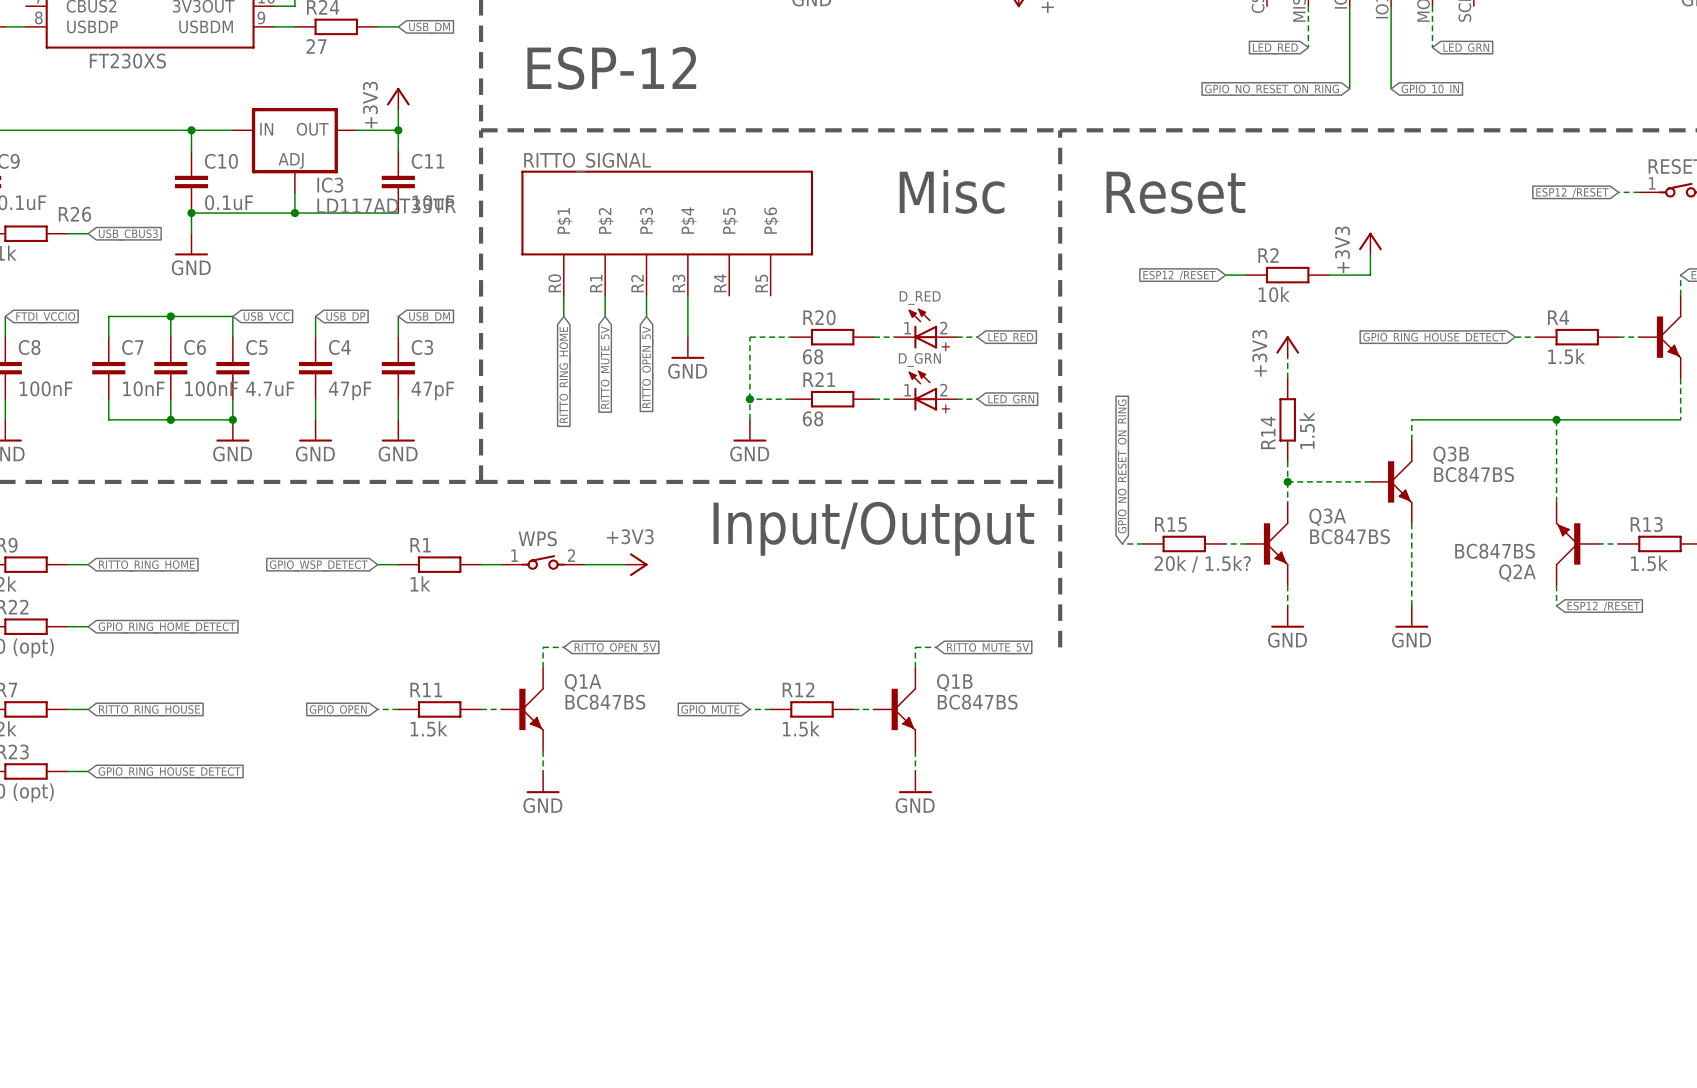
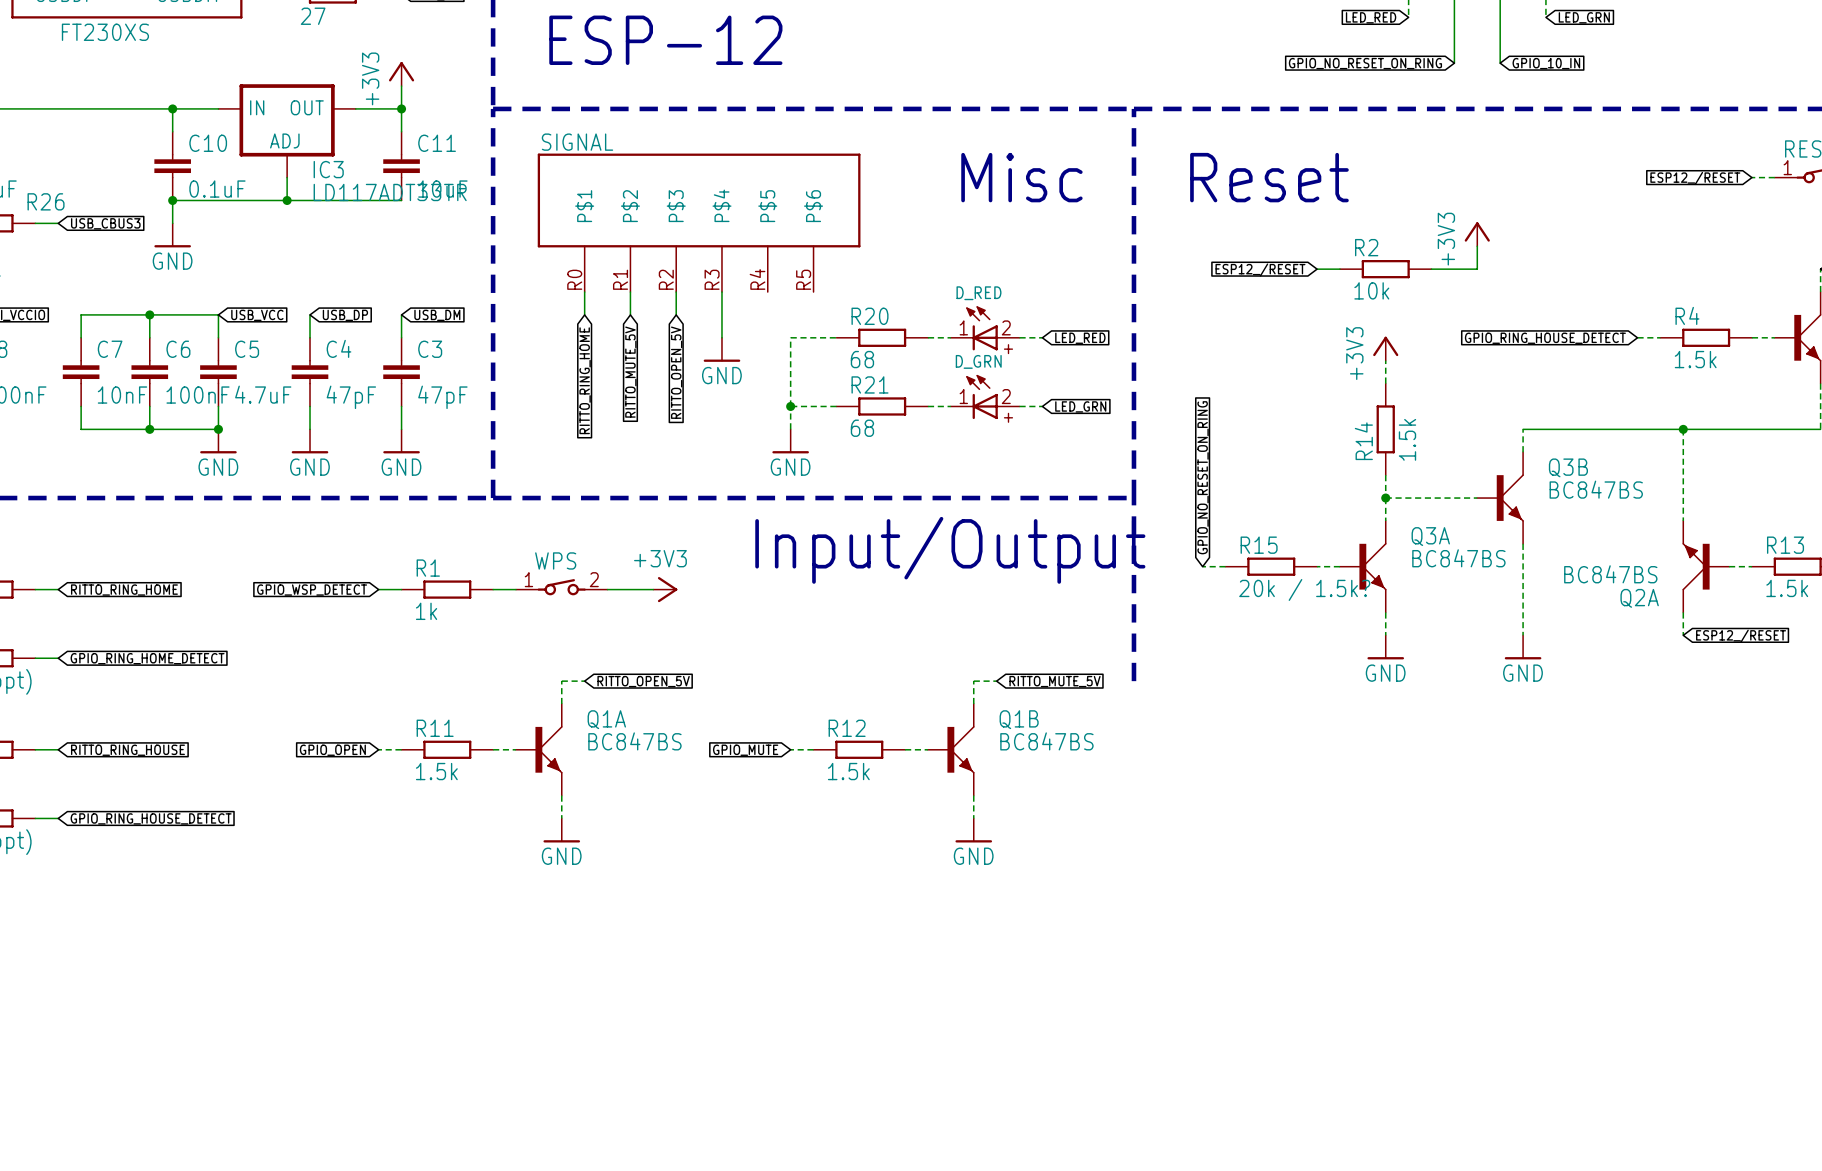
RITTO_SIGNAL name: RITTO_SIGNAL (587, 162) -> SIGNAL (577, 142)

